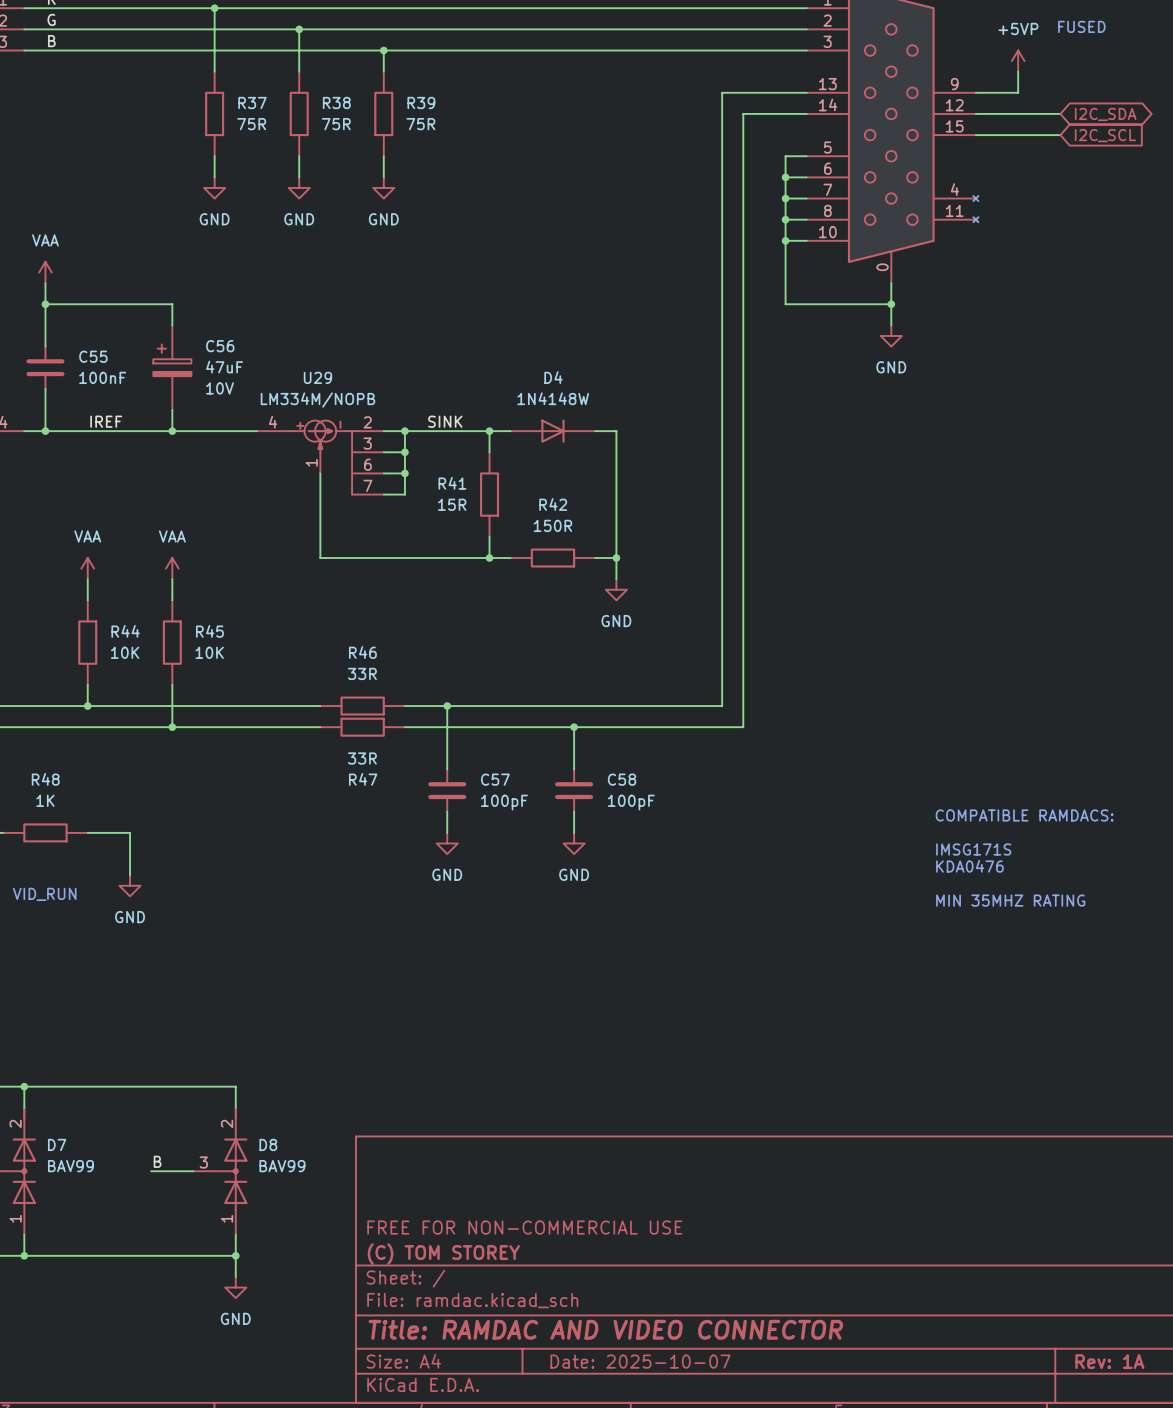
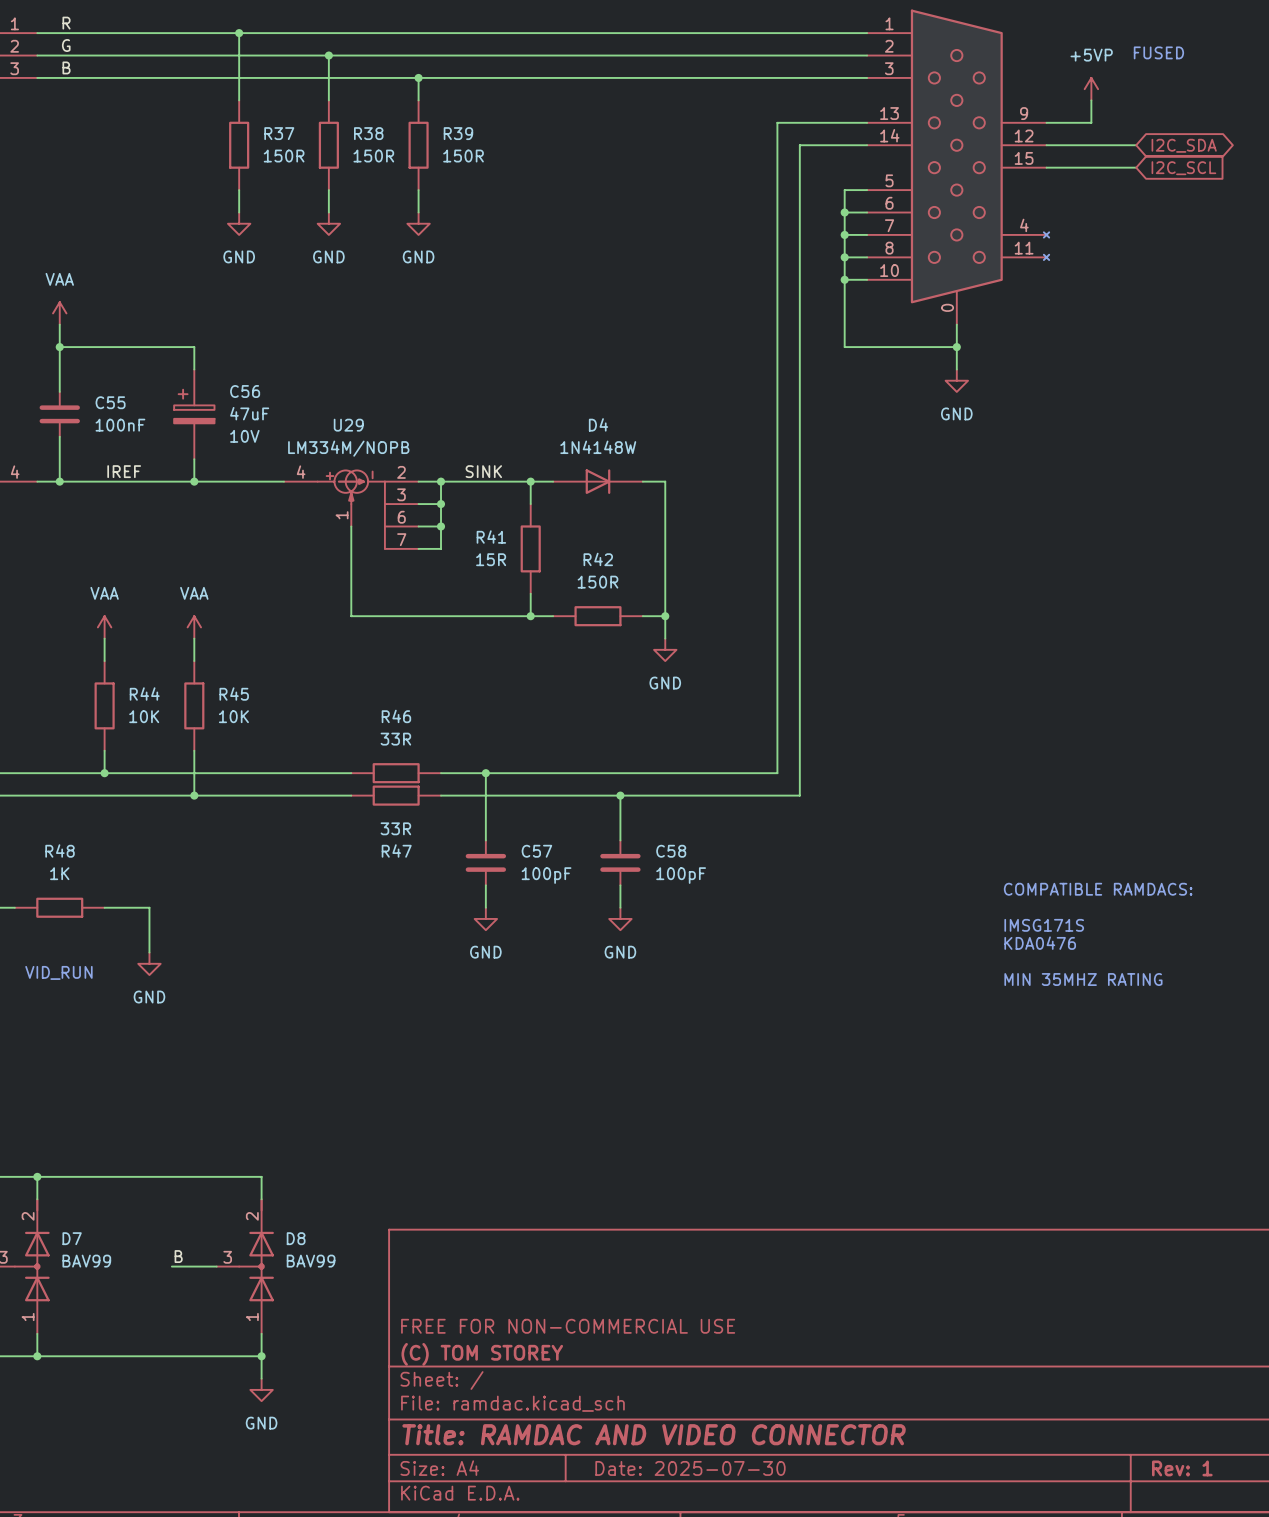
R37 value: 75R (251, 124) -> 150R (284, 156)
R38 value: 75R (336, 124) -> 150R (373, 156)
R39 value: 75R (420, 124) -> 150R (463, 156)
title block: Date: 2025-10-07 (640, 1361) -> Date: 2025-07-30 (690, 1468)
title block: Rev: 1A (1109, 1361) -> Rev: 1 (1182, 1468)

